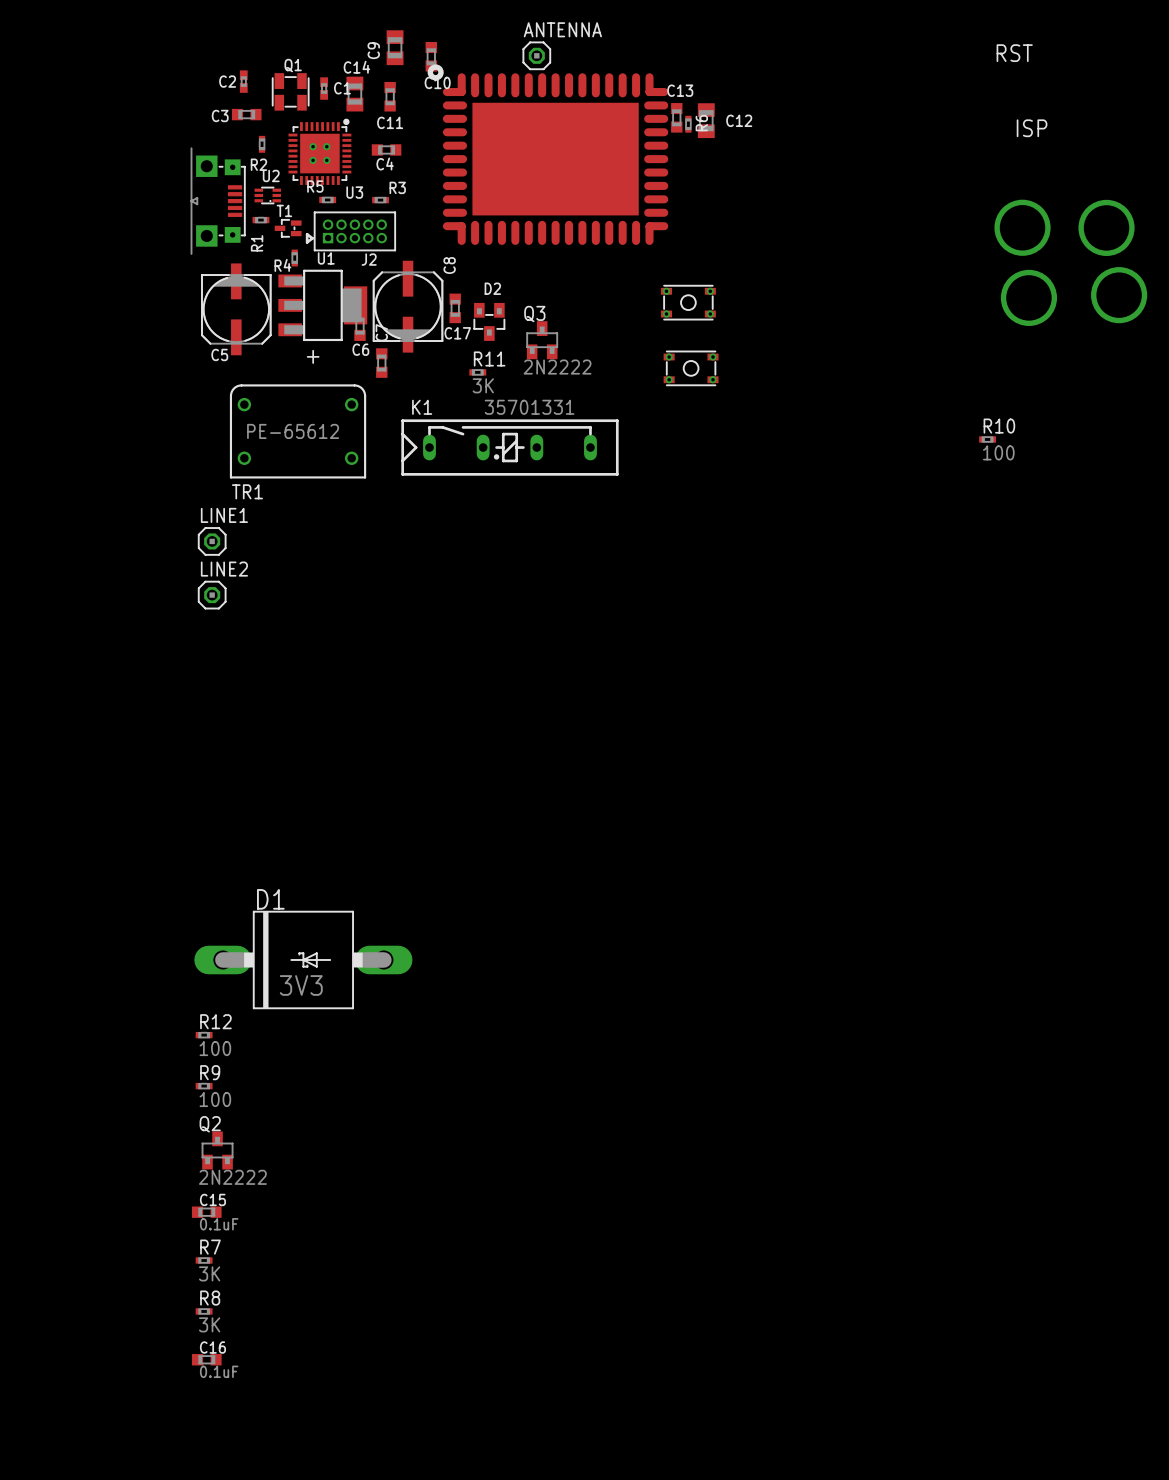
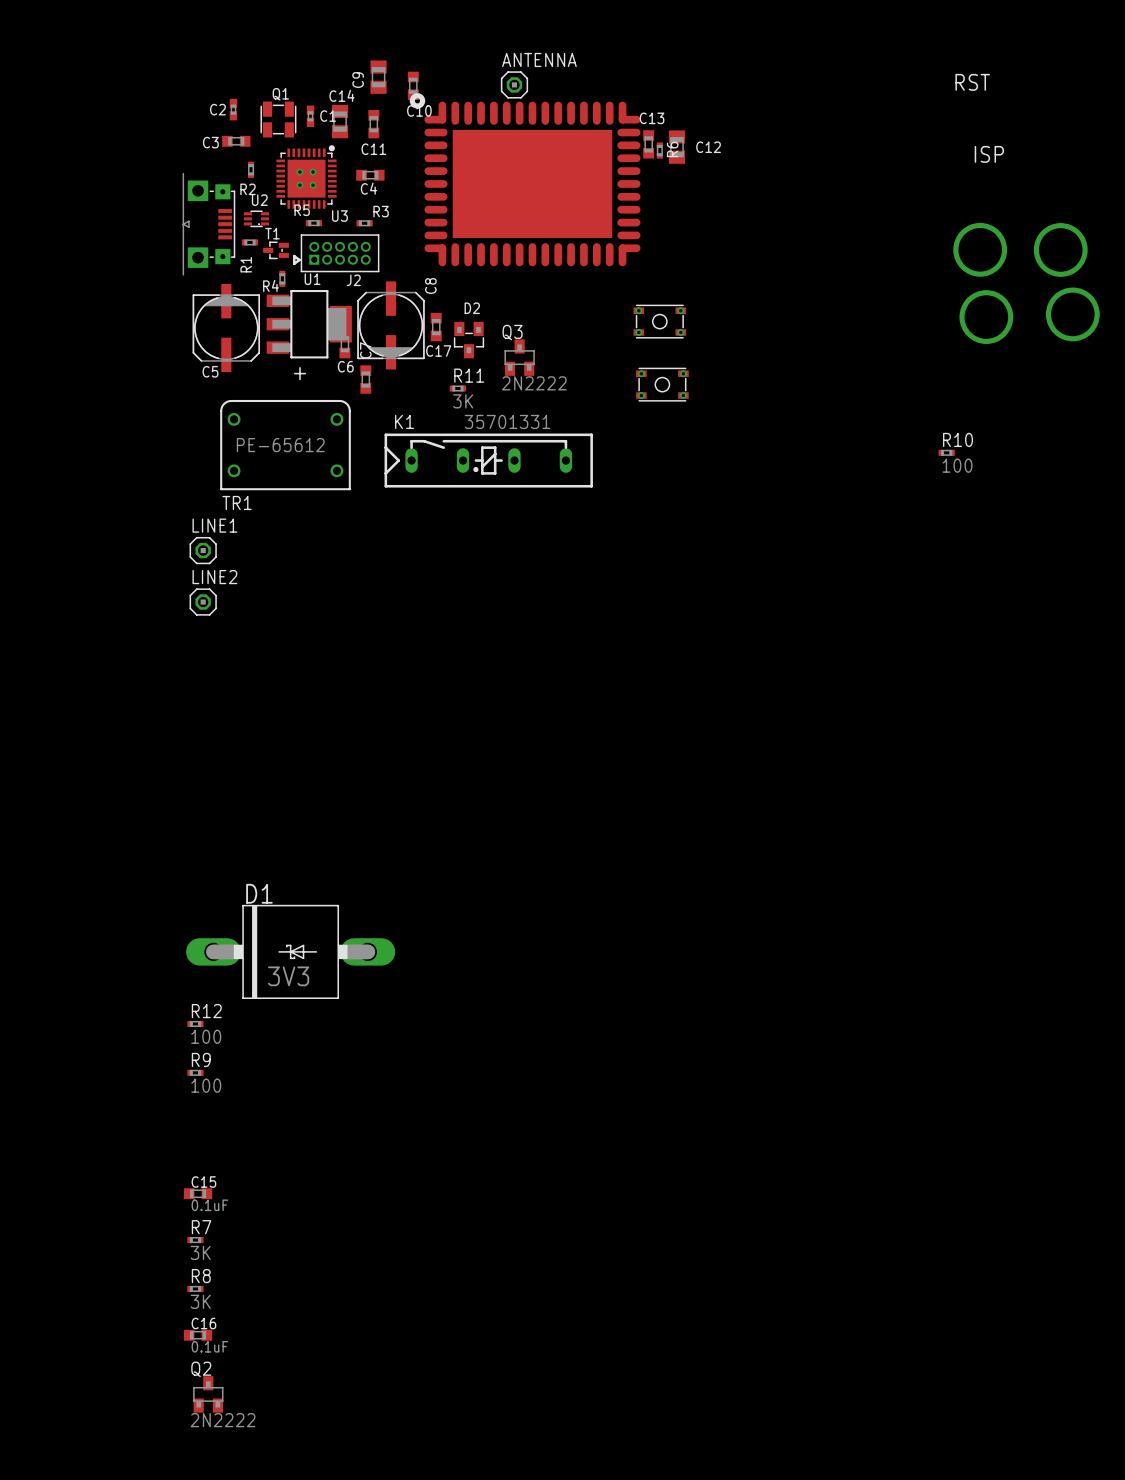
Q2 footprint: [201, 1131, 234, 1170] -> [193, 1376, 224, 1413]

